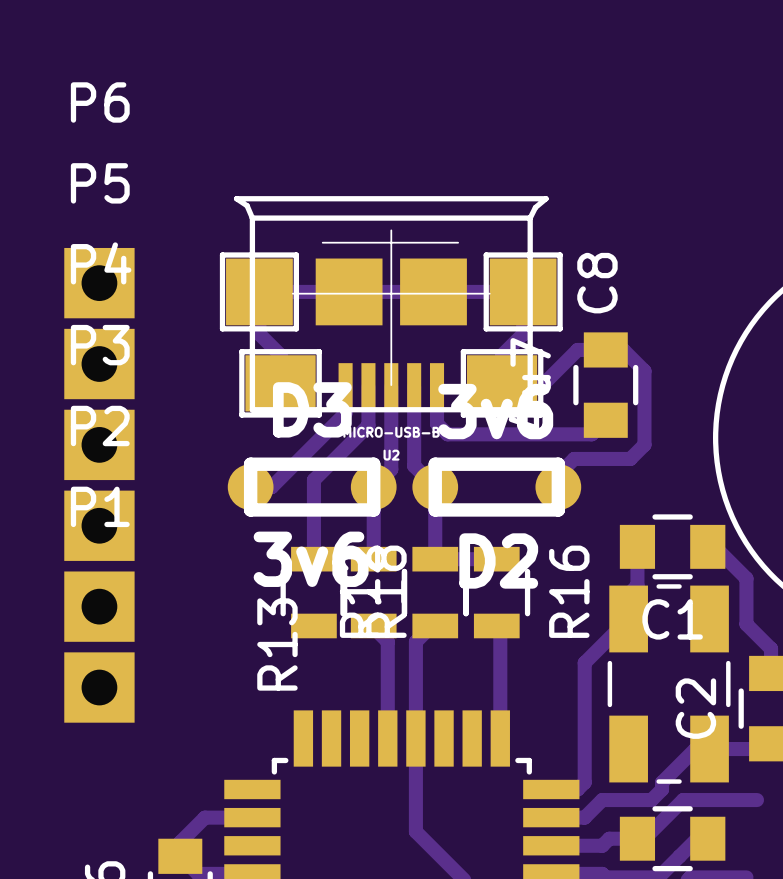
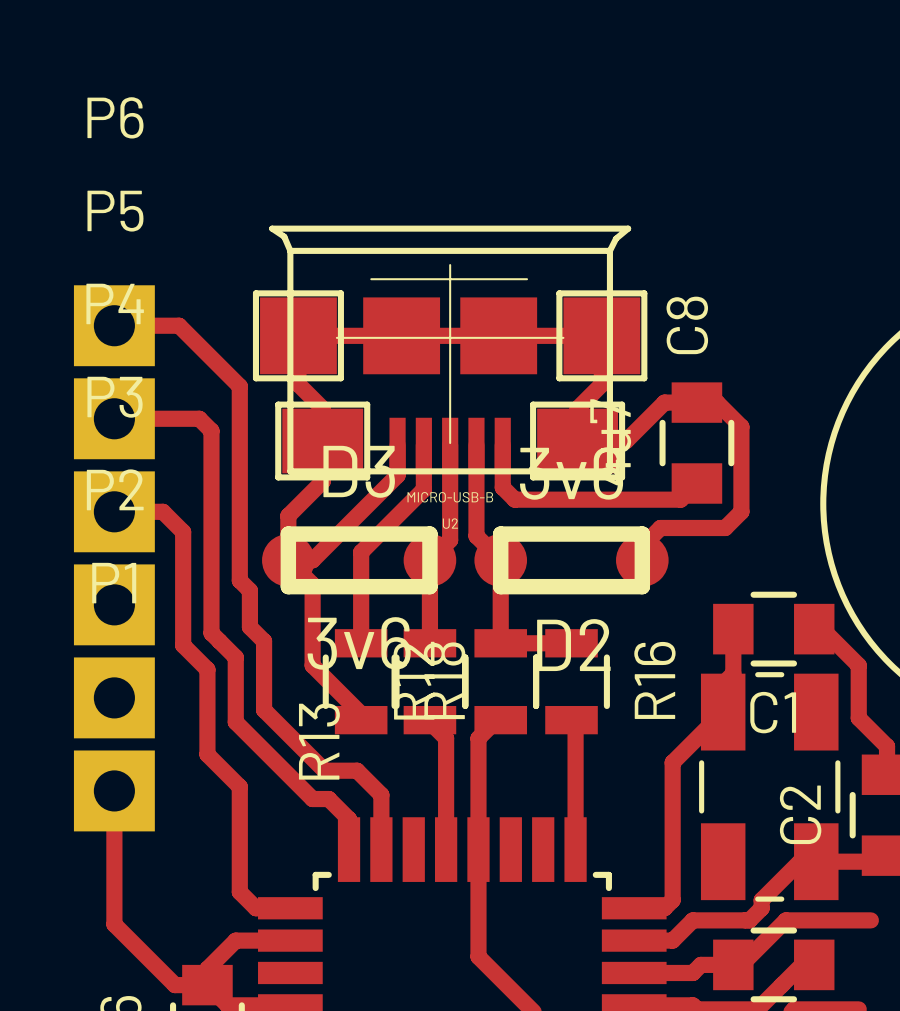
track: none -> (114, 325) (179, 325) (239, 386) (239, 580) (249, 590) (249, 627) (264, 641) (264, 710) (324, 770) (357, 770) (381, 794) (381, 849)
track: none -> (114, 418) (199, 418) (211, 430) (211, 633) (235, 657) (235, 722) (312, 799) (328, 799) (349, 819) (349, 849)
track: none -> (322, 441) (322, 481) (288, 515) (288, 560) (312, 584) (312, 665) (361, 714) (361, 720)
track: none -> (114, 511) (162, 511) (183, 532) (183, 645) (207, 669) (207, 754) (239, 786) (239, 892) (255, 908) (290, 908)
track: none -> (114, 790) (114, 924) (175, 985) (207, 985)

